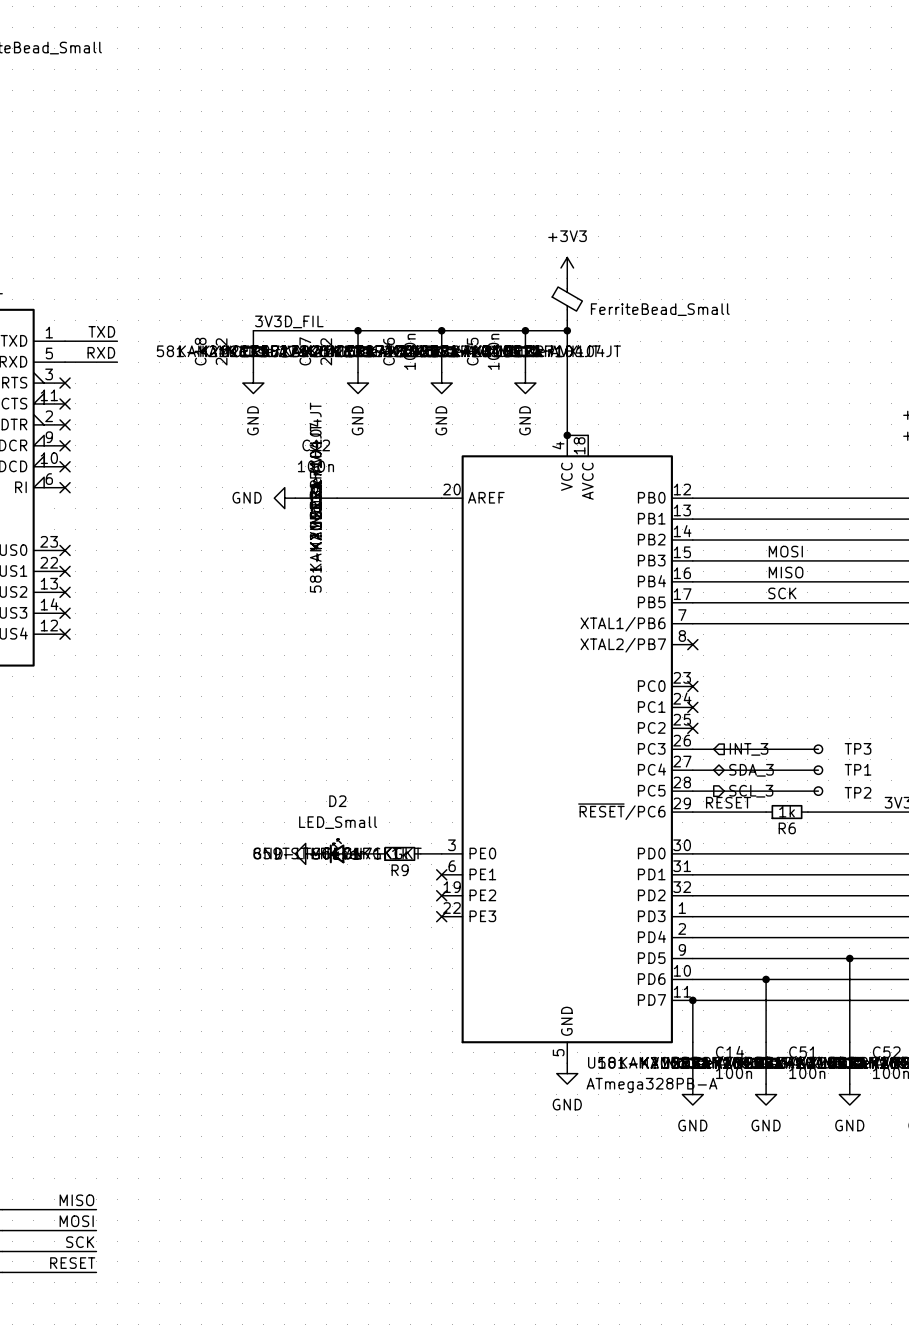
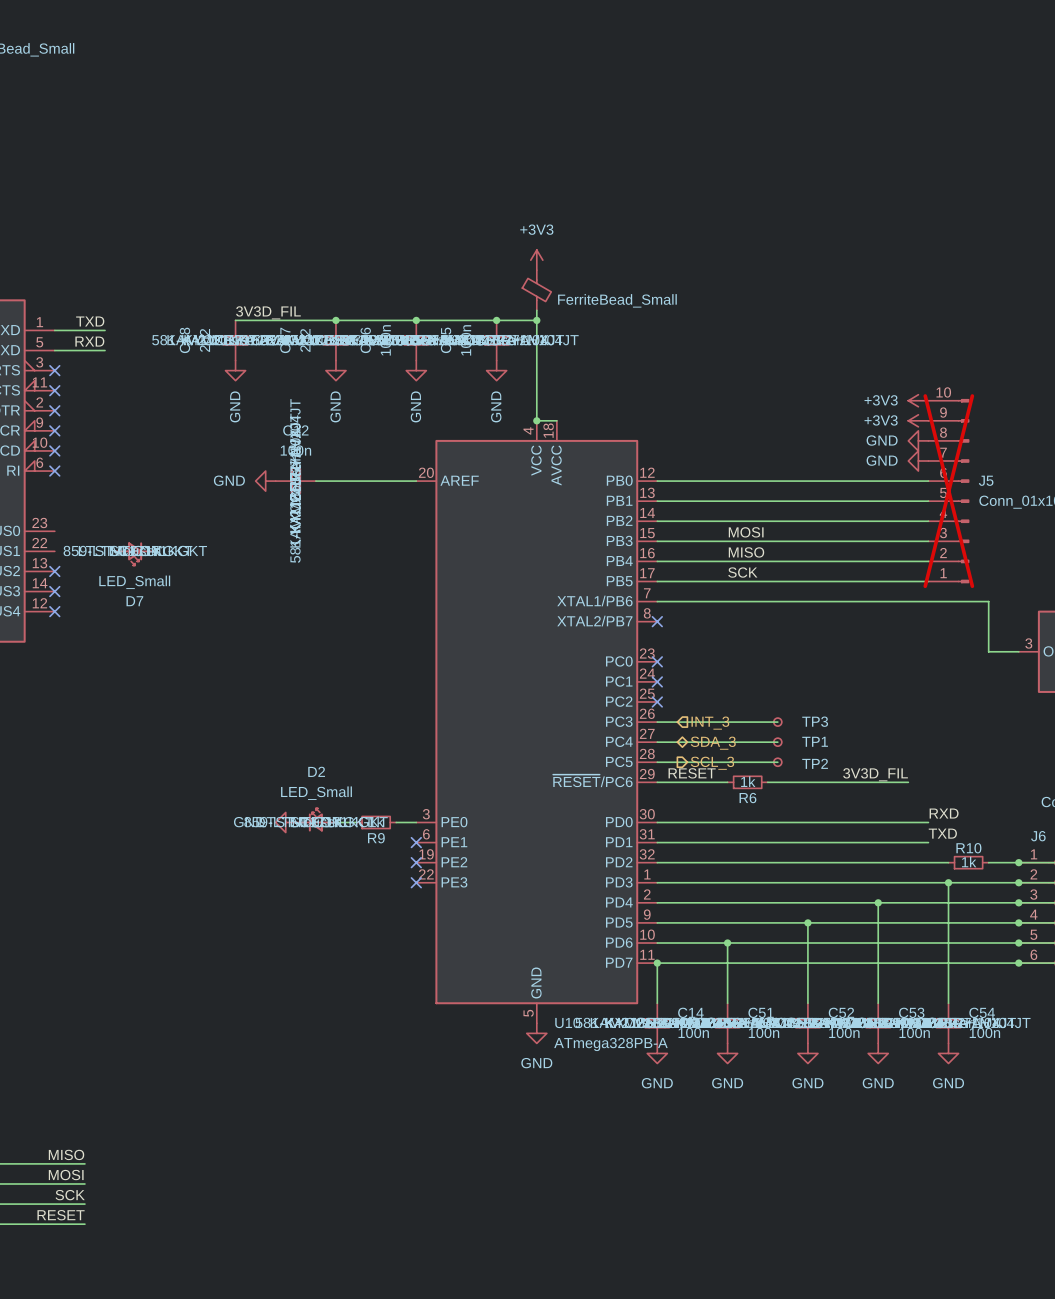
no-connect mark: (65, 550) -> none
no-connect mark: (65, 571) -> none
D7: none -> LED_Small (135, 553)

